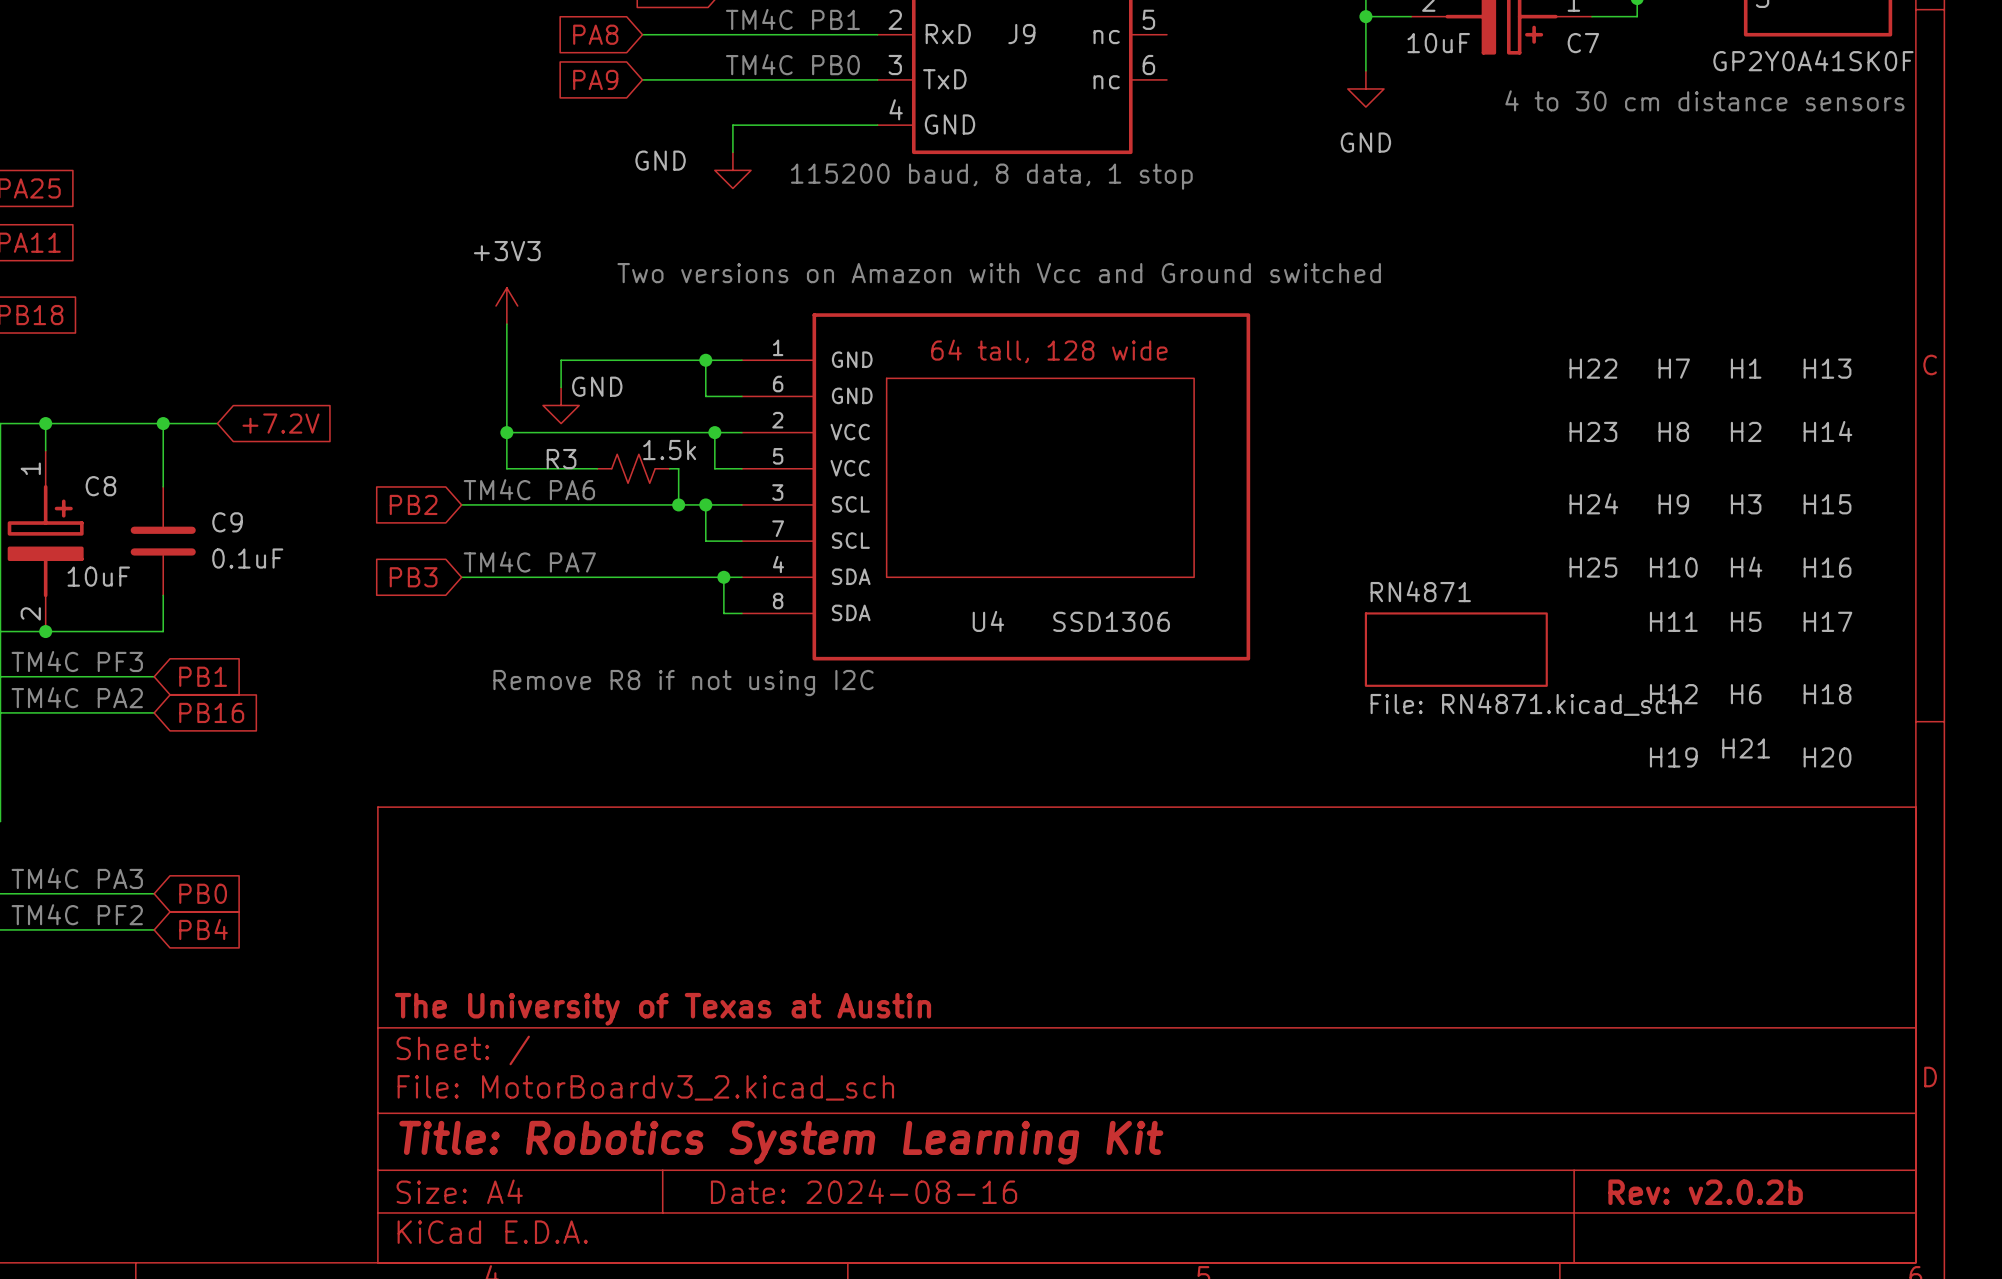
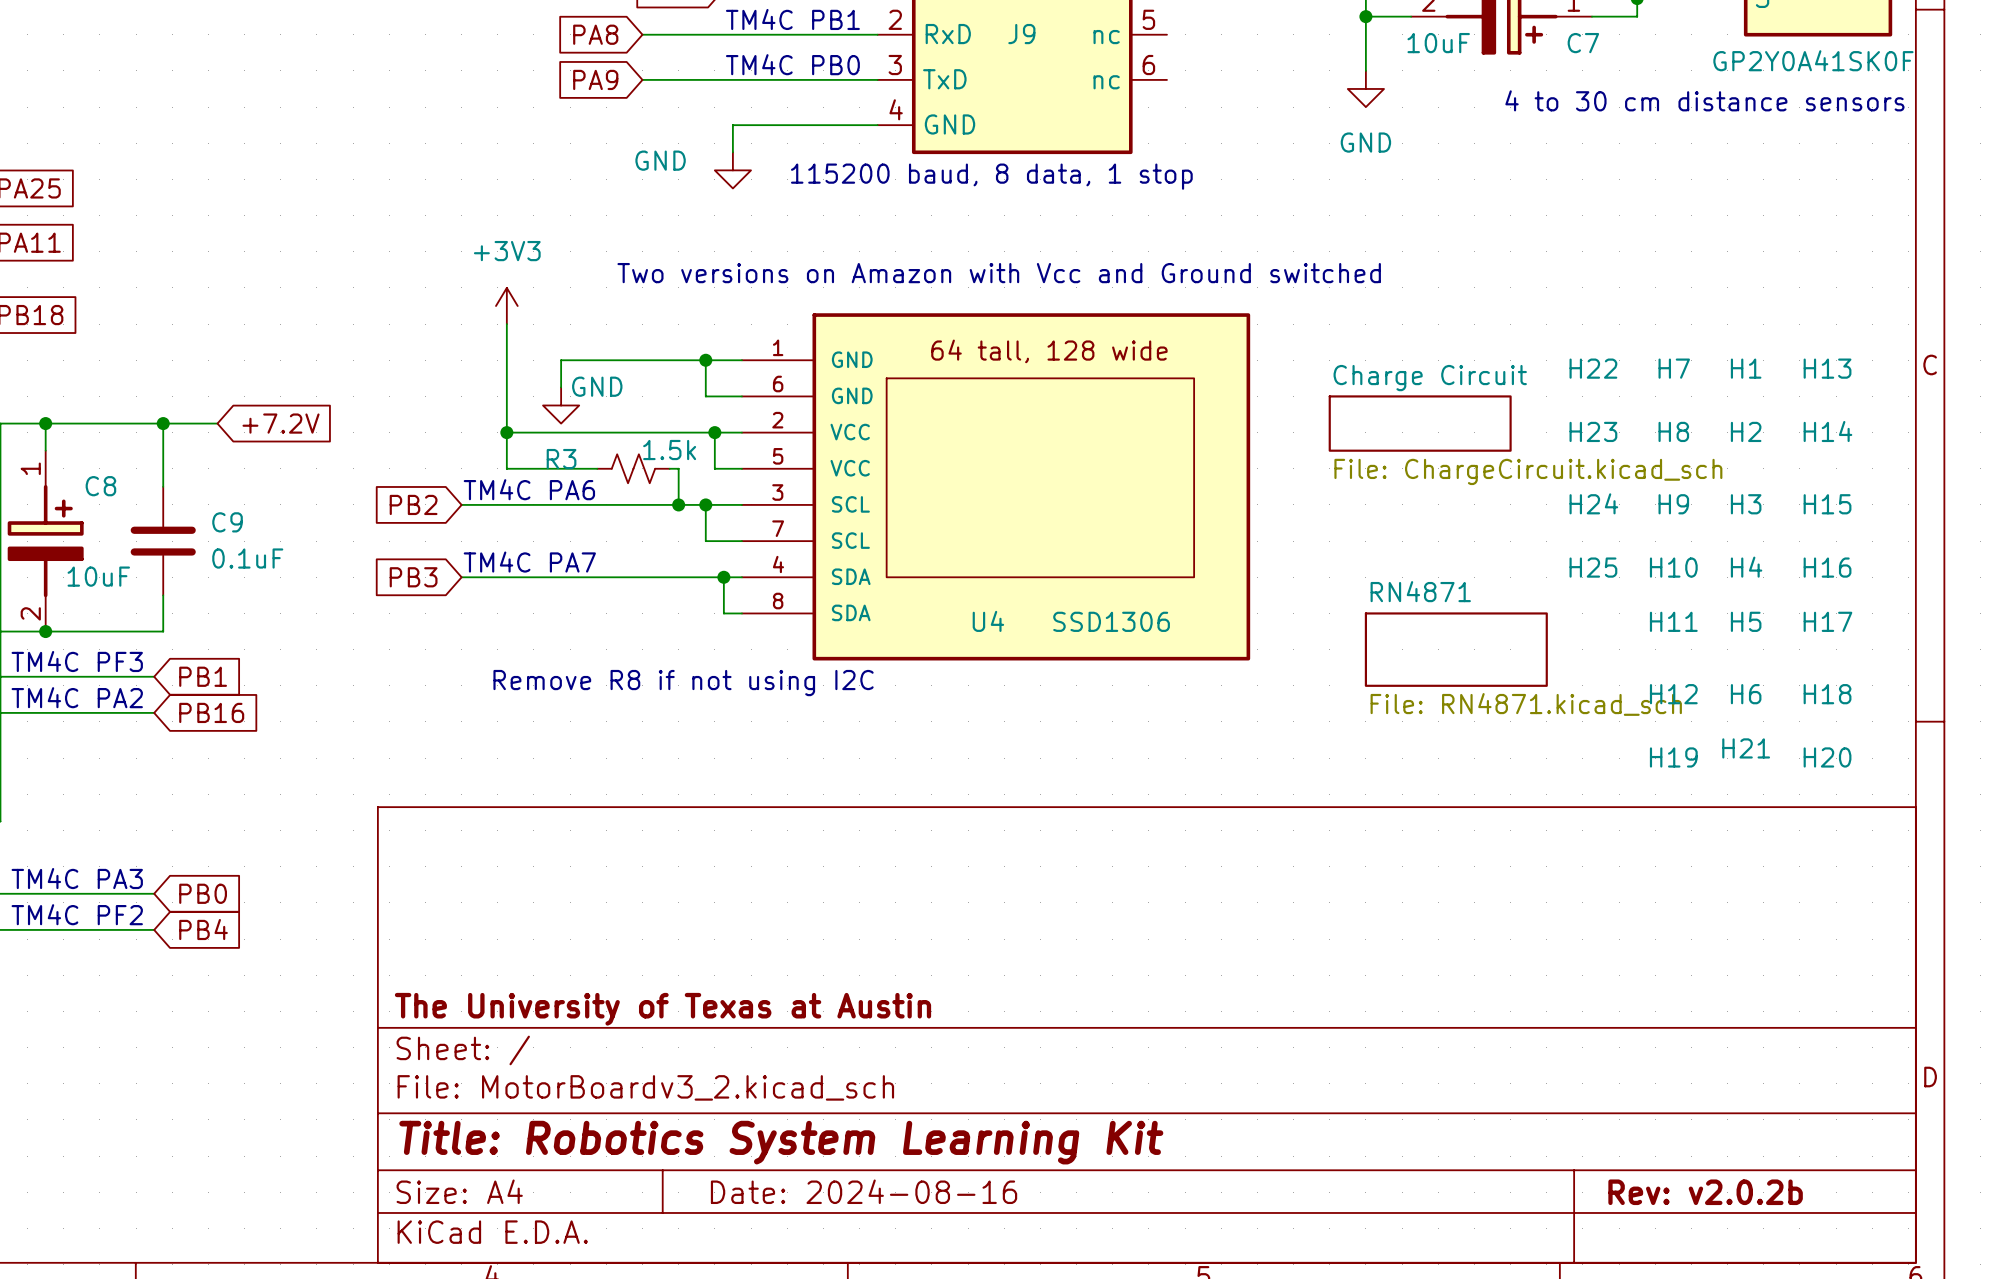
sheet Charge Circuit: none -> File: ChargeCircuit.kicad_sch (1420, 423)

